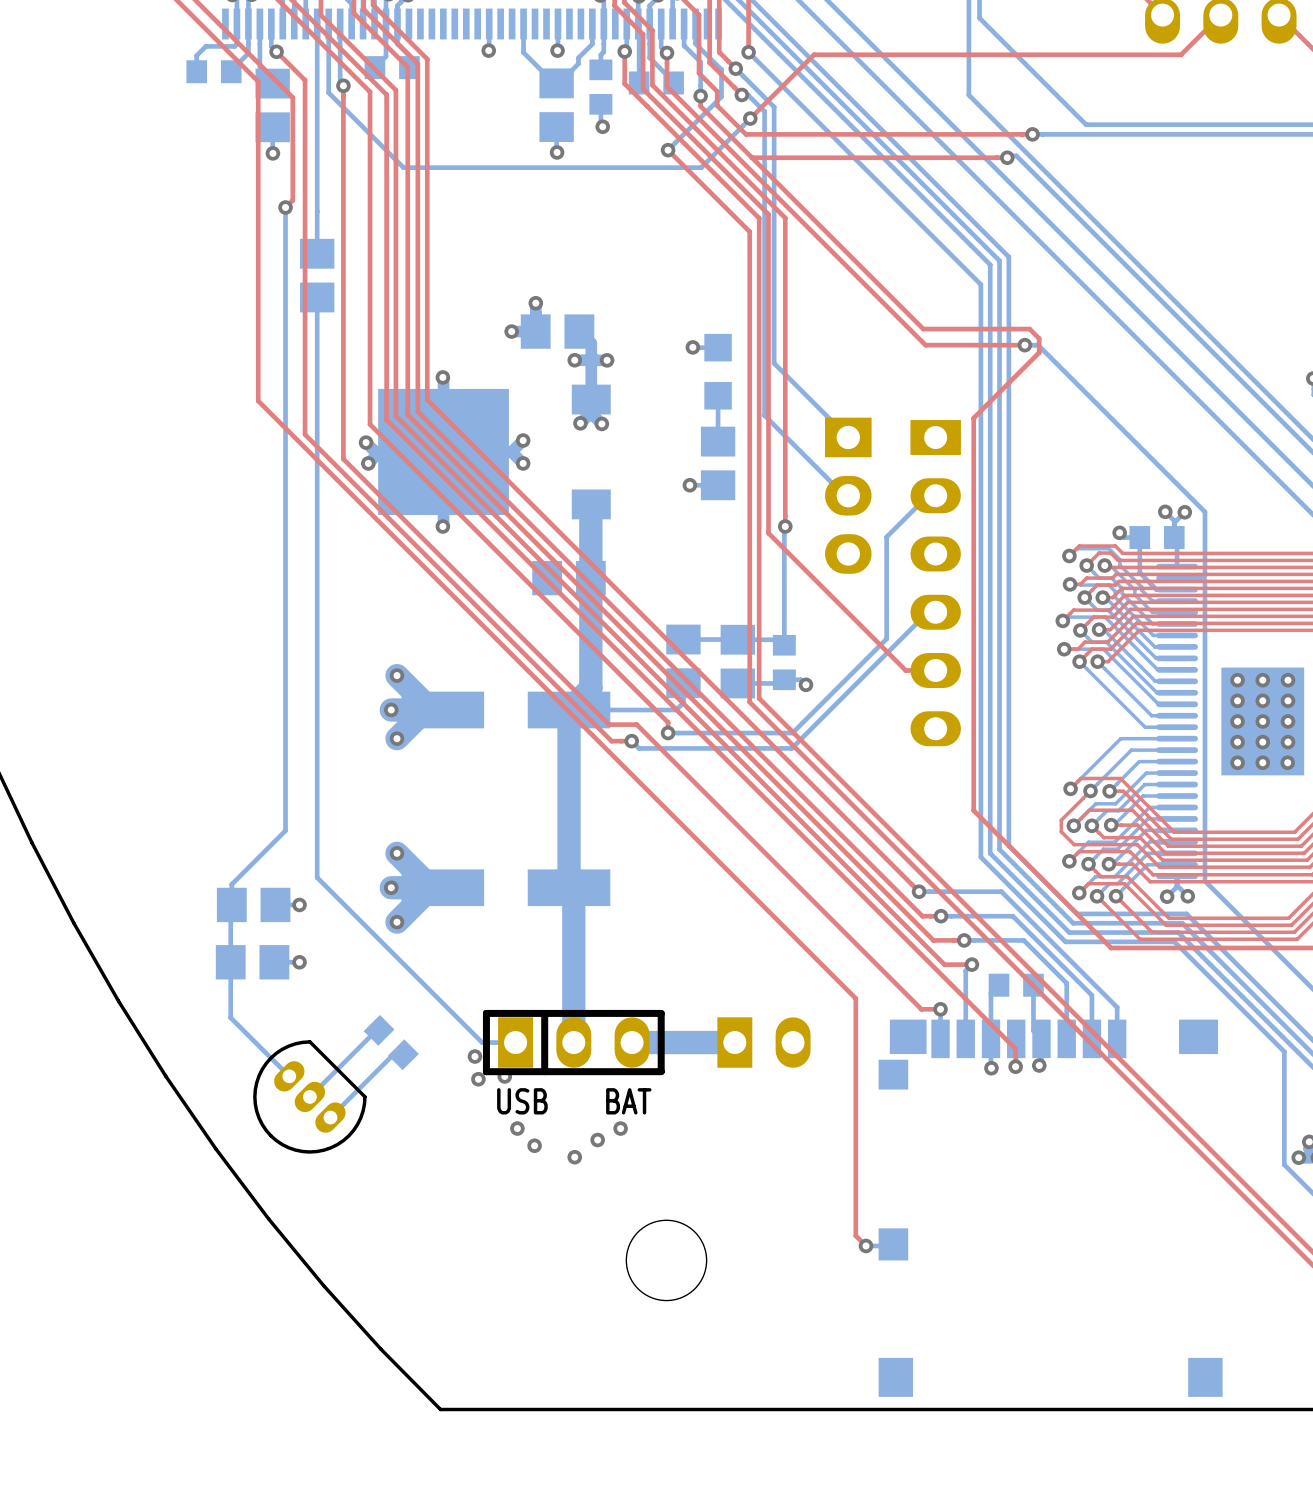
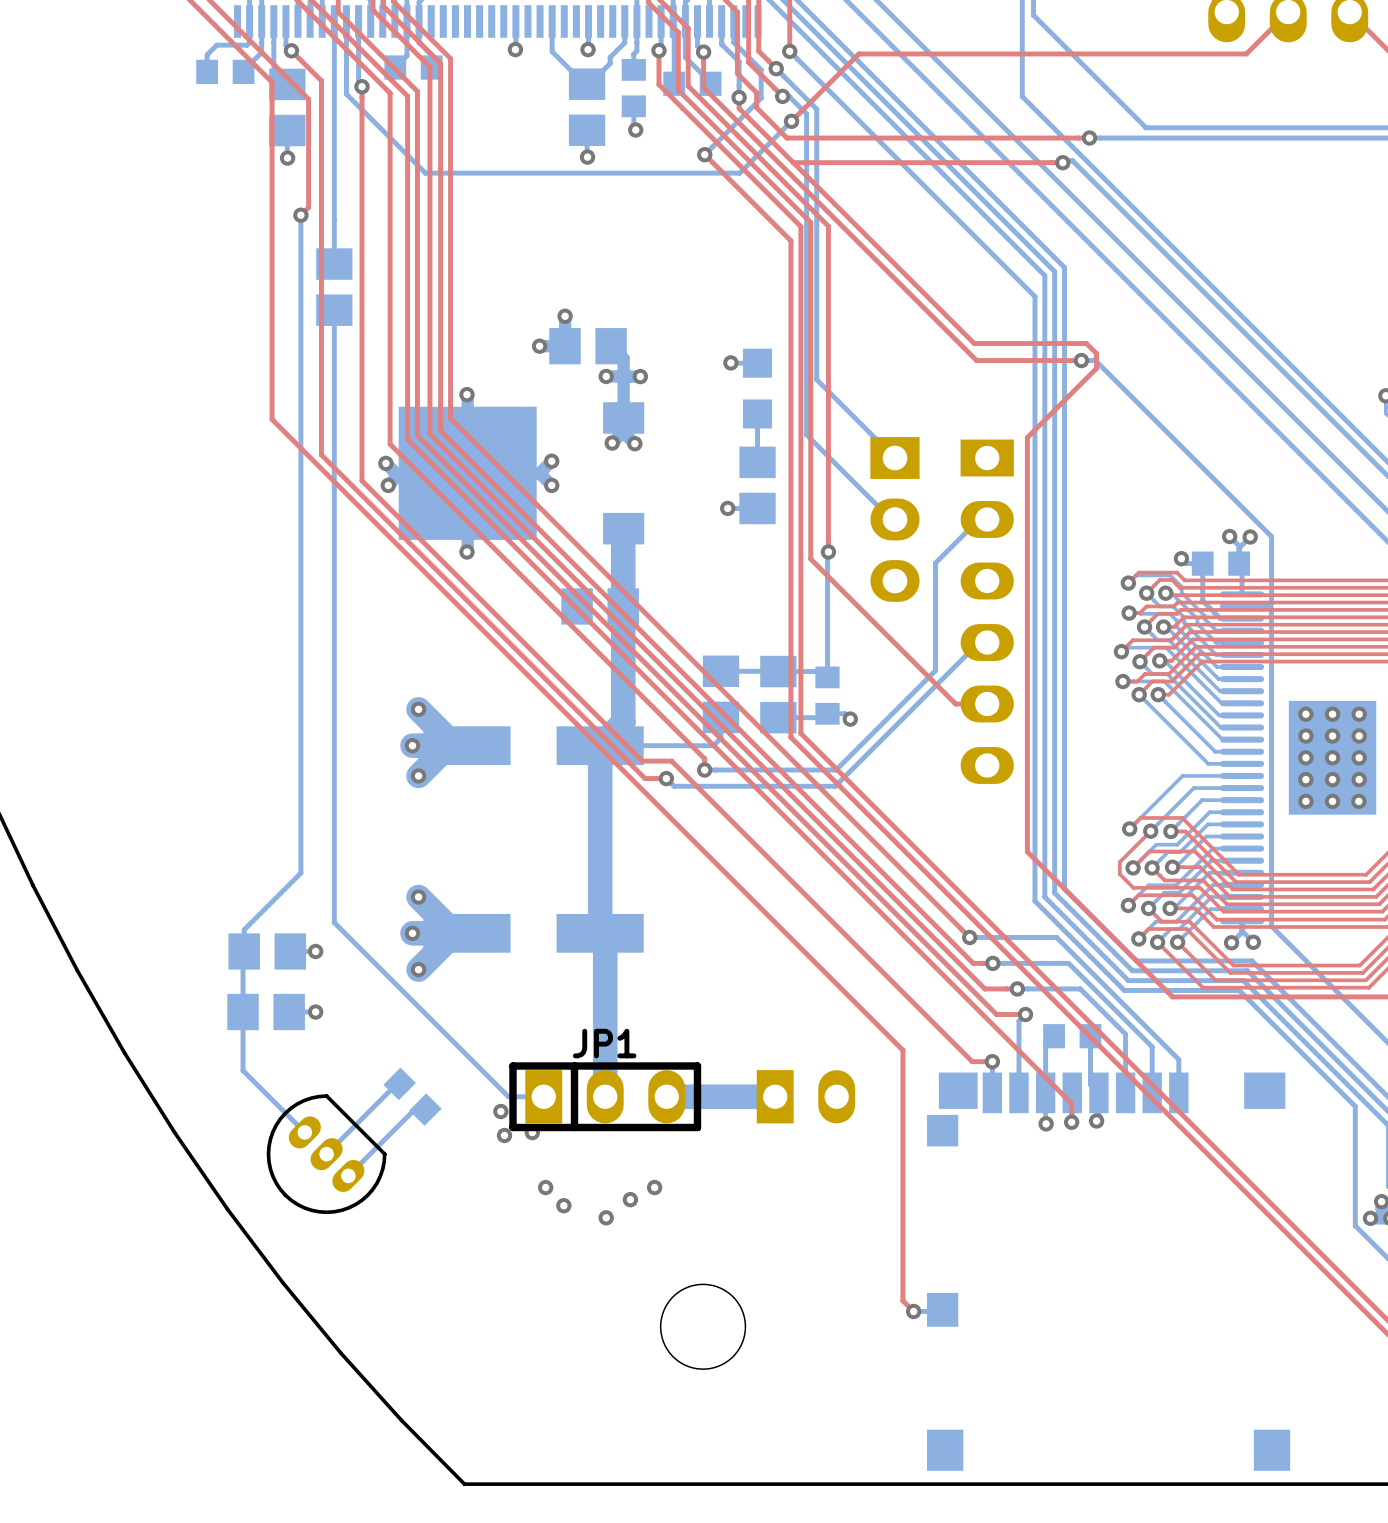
JP1 name: none -> JP1 (604, 1043)
text: USB (522, 1101) -> none
text: BAT (628, 1101) -> none

